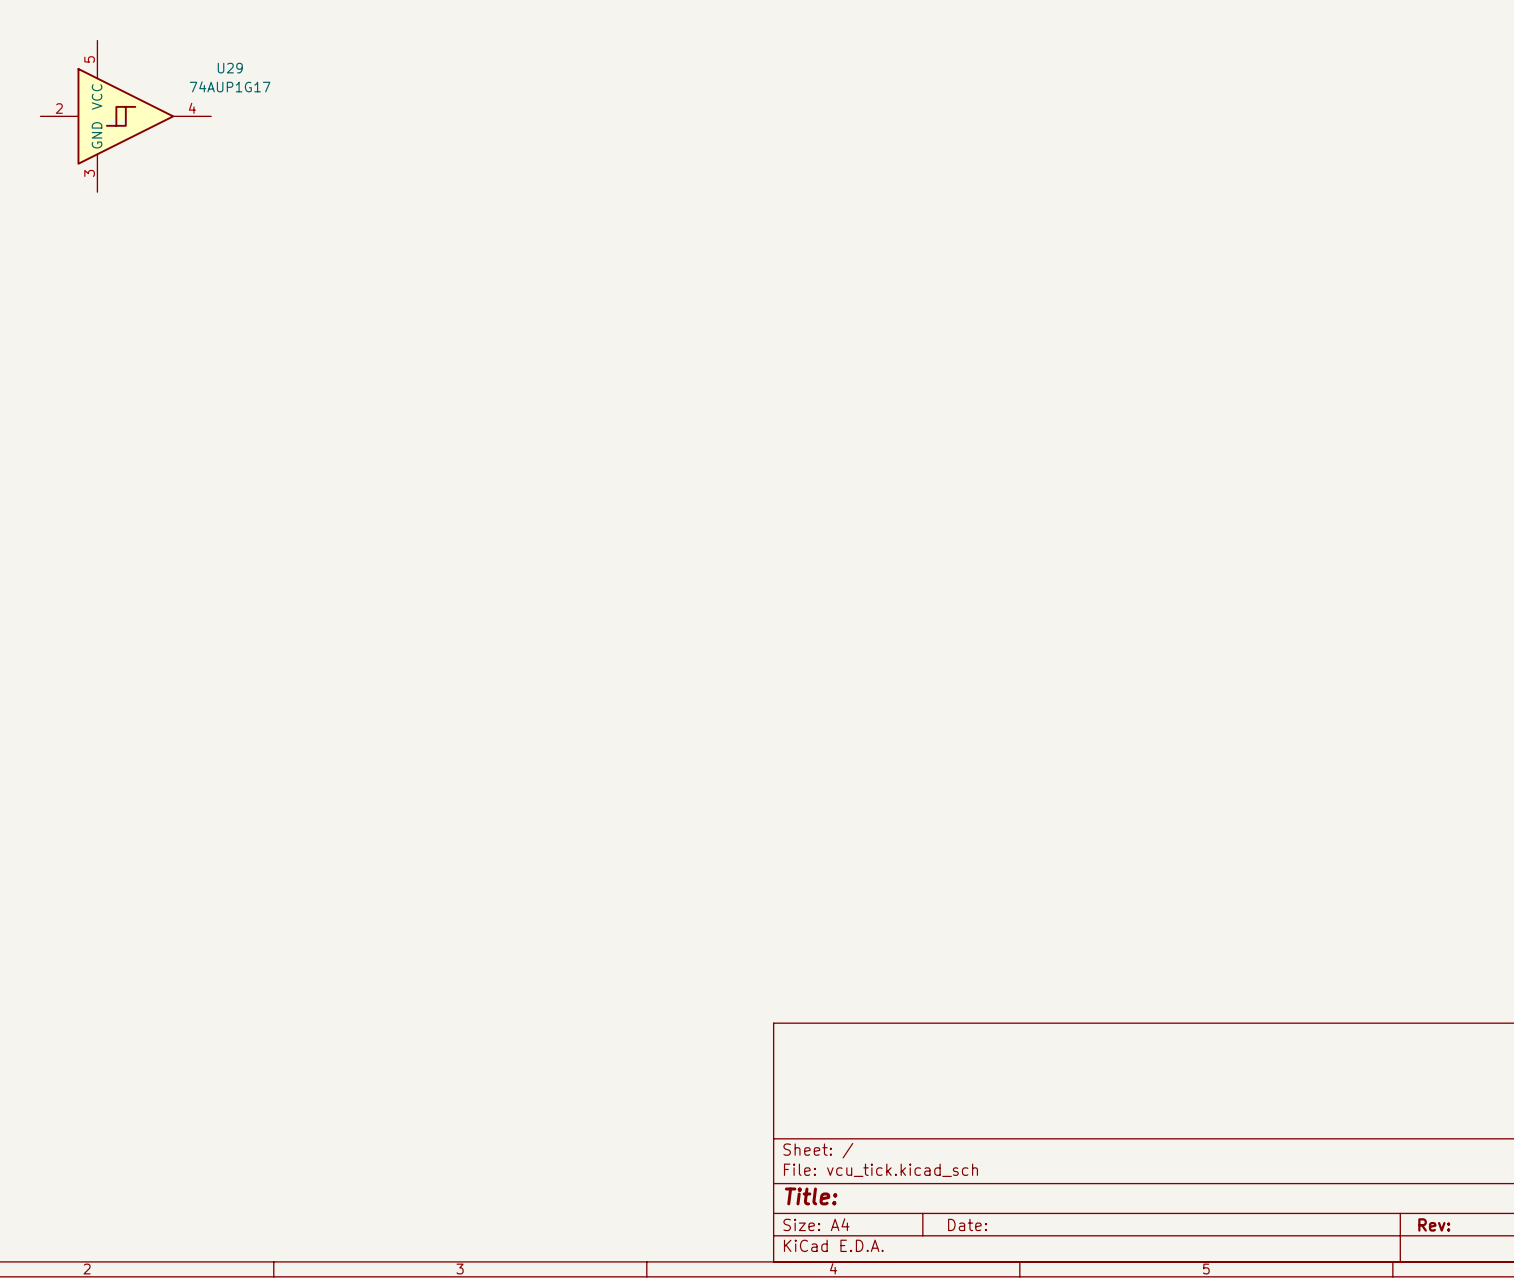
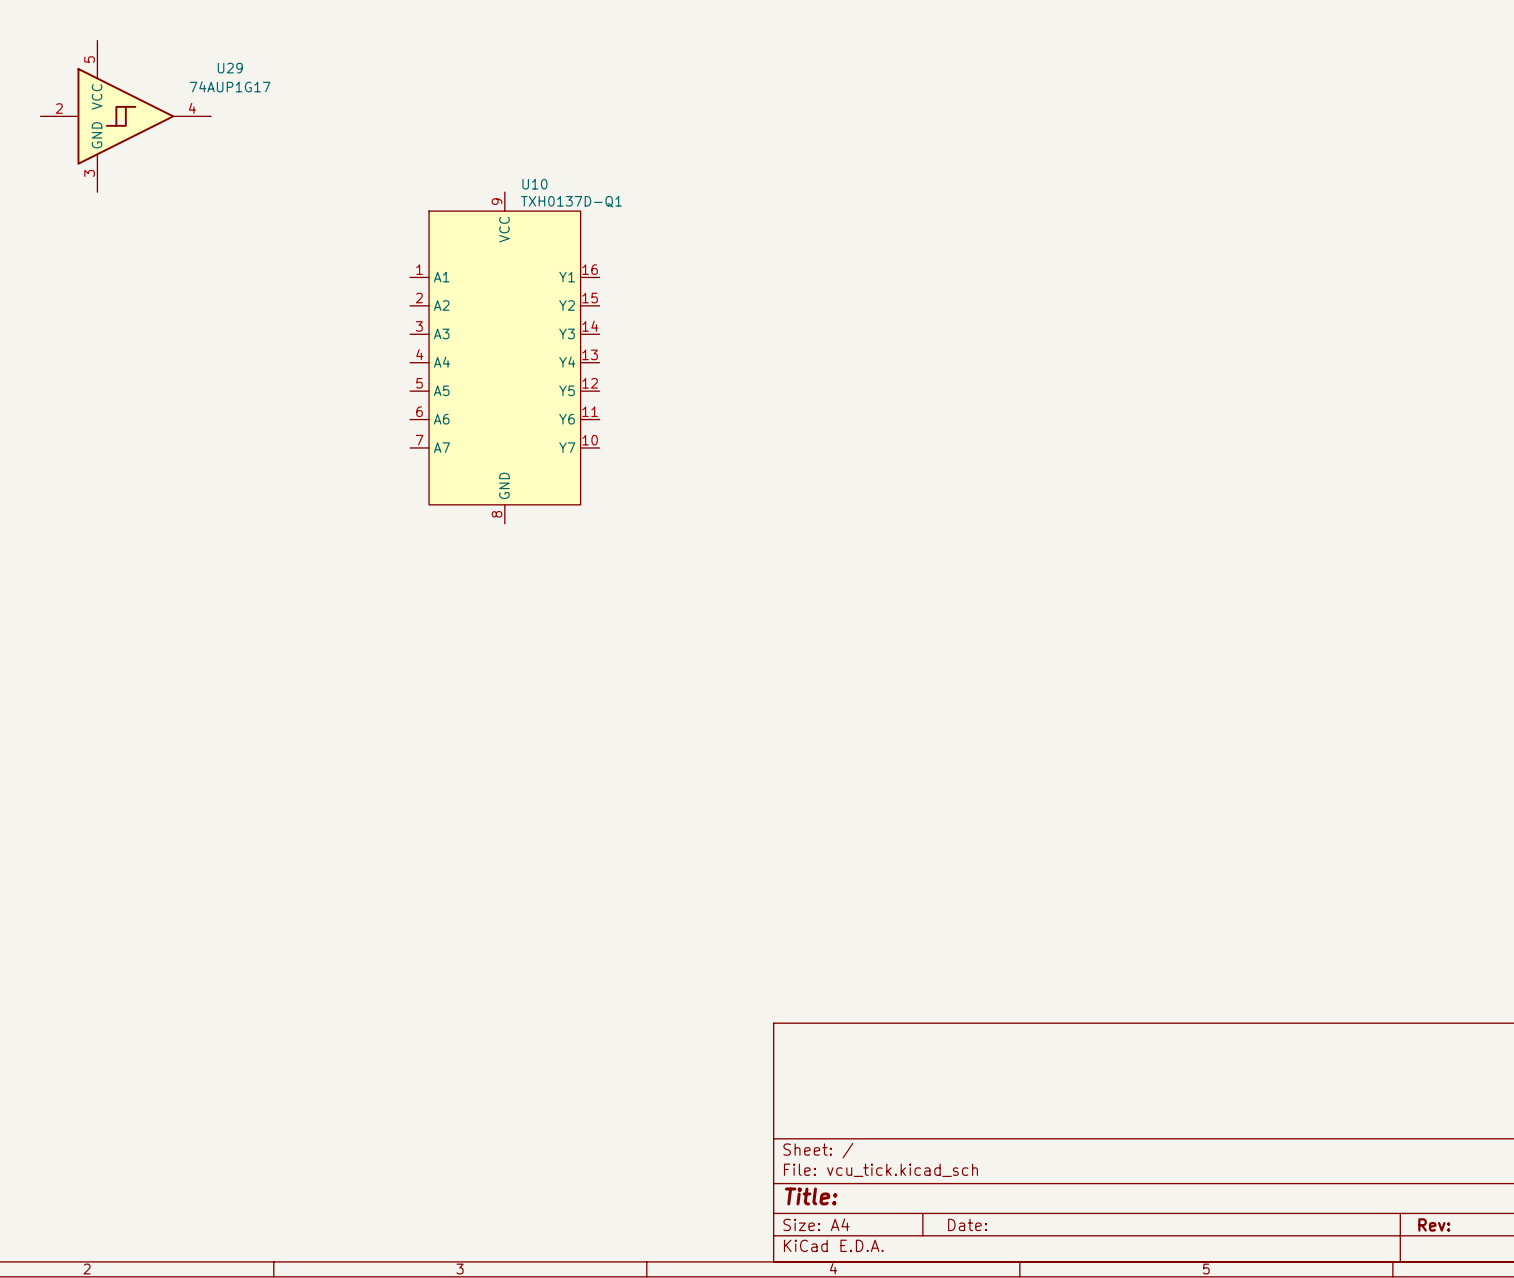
U10: none -> TXH0137D-Q1 (504, 357)

